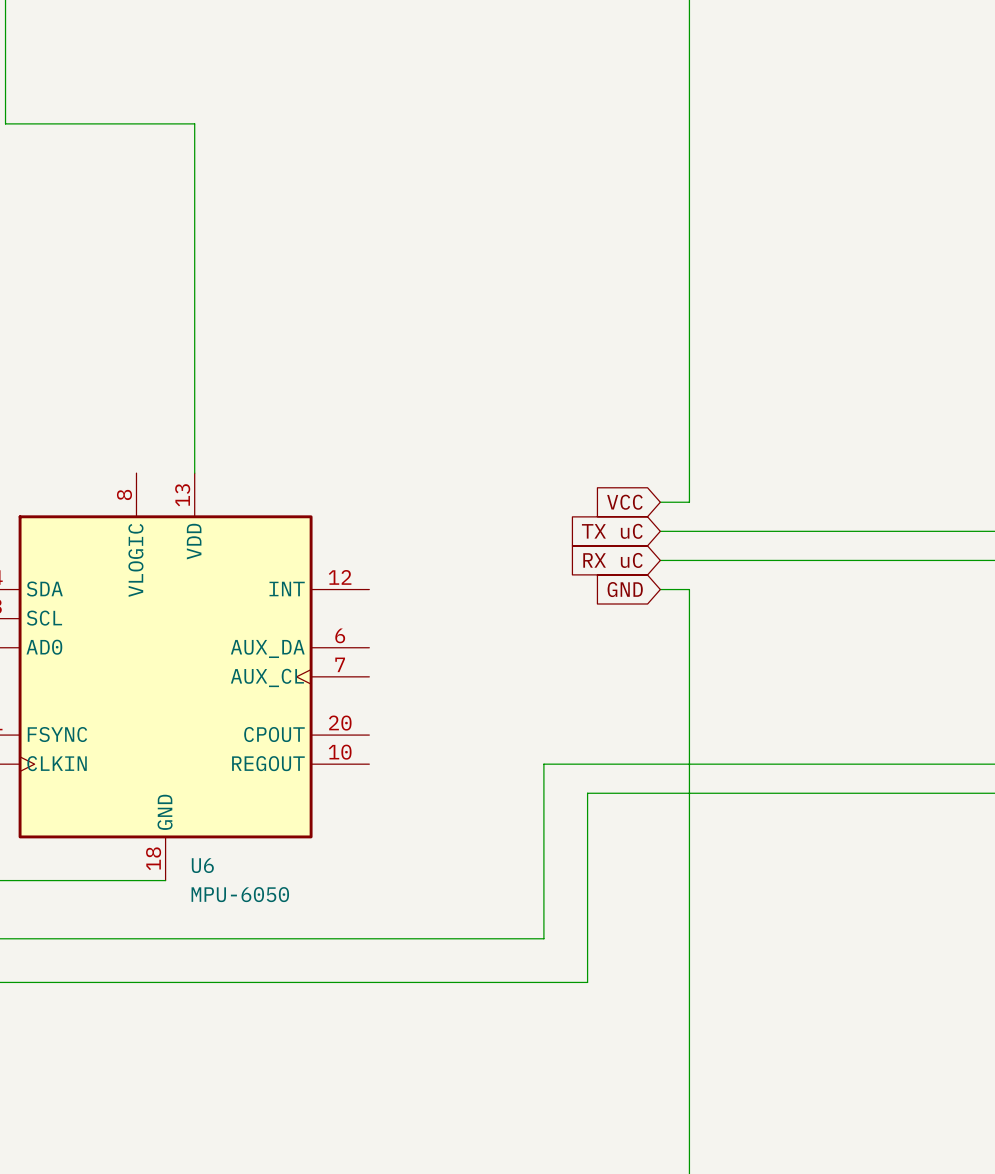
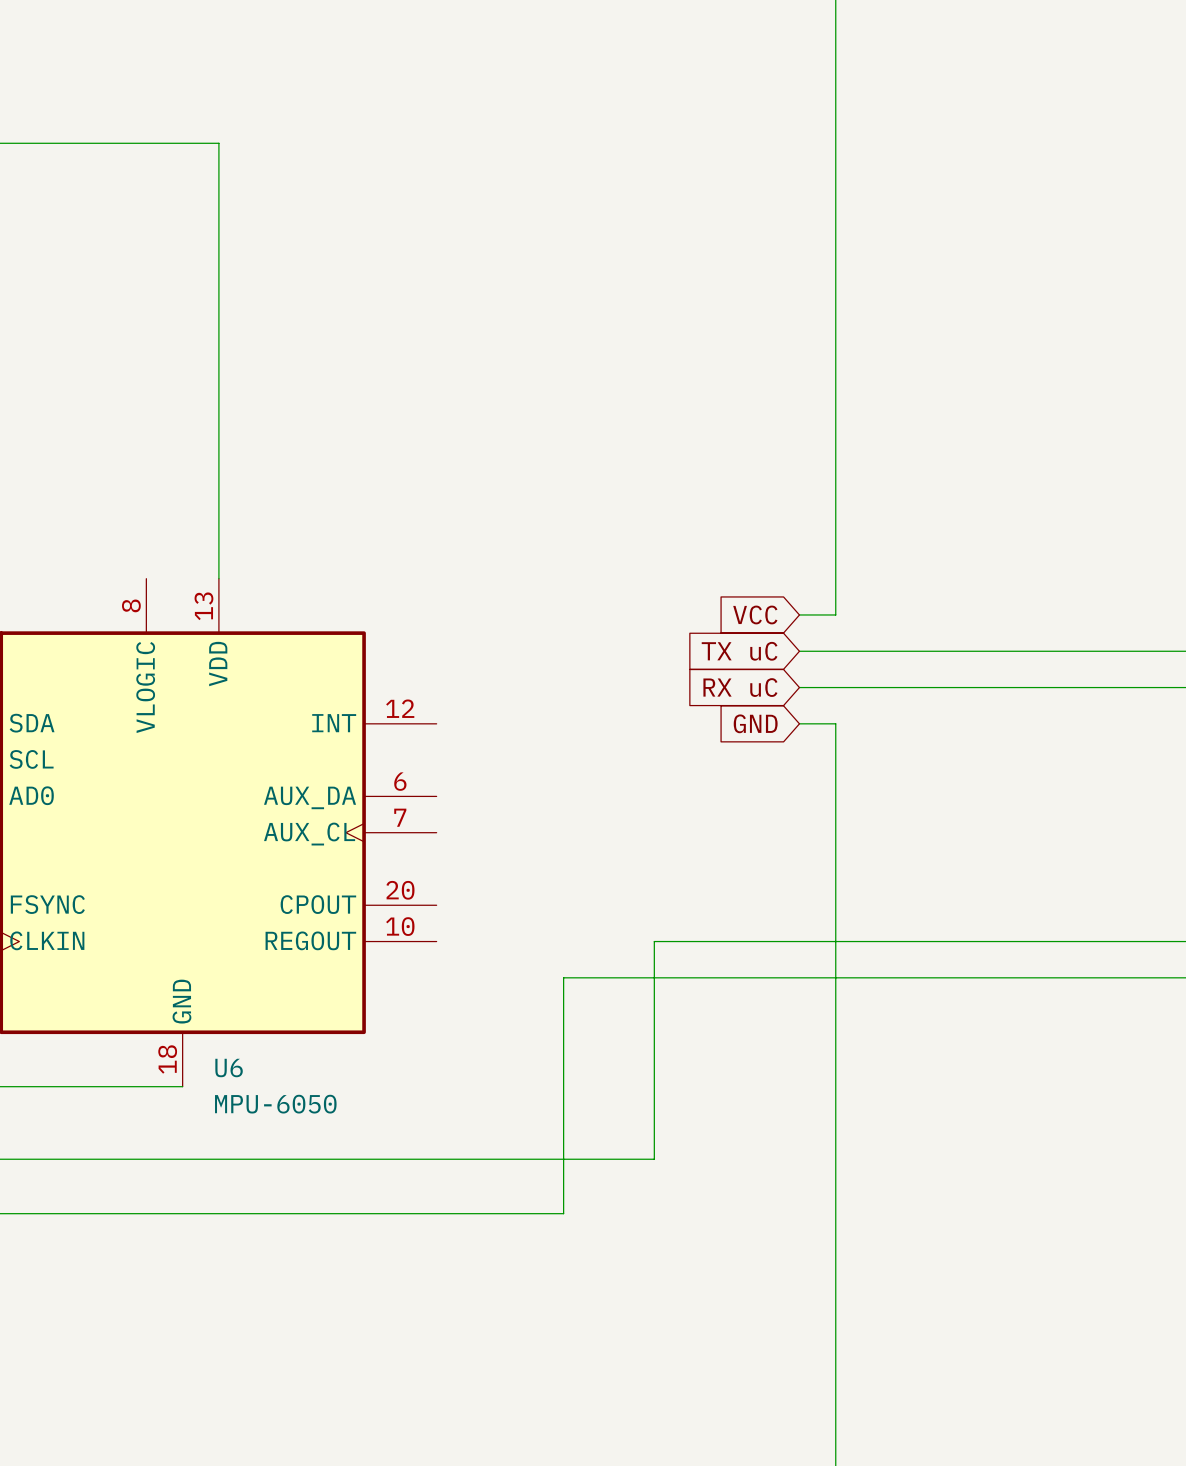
wire: (587, 793) (587, 982) (471, 982) -> (708, 977) (563, 977) (563, 1213)

